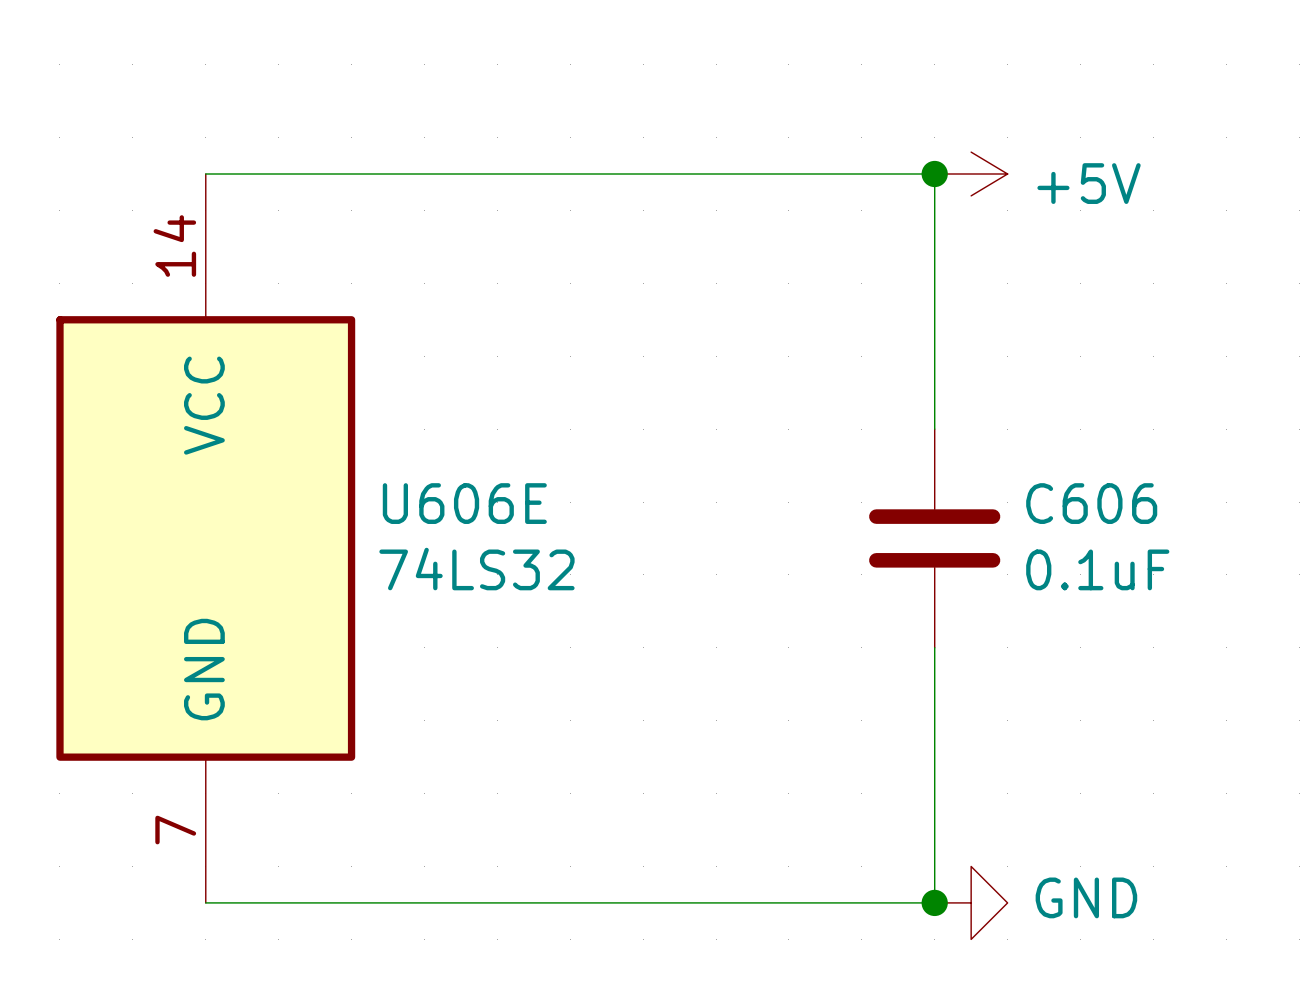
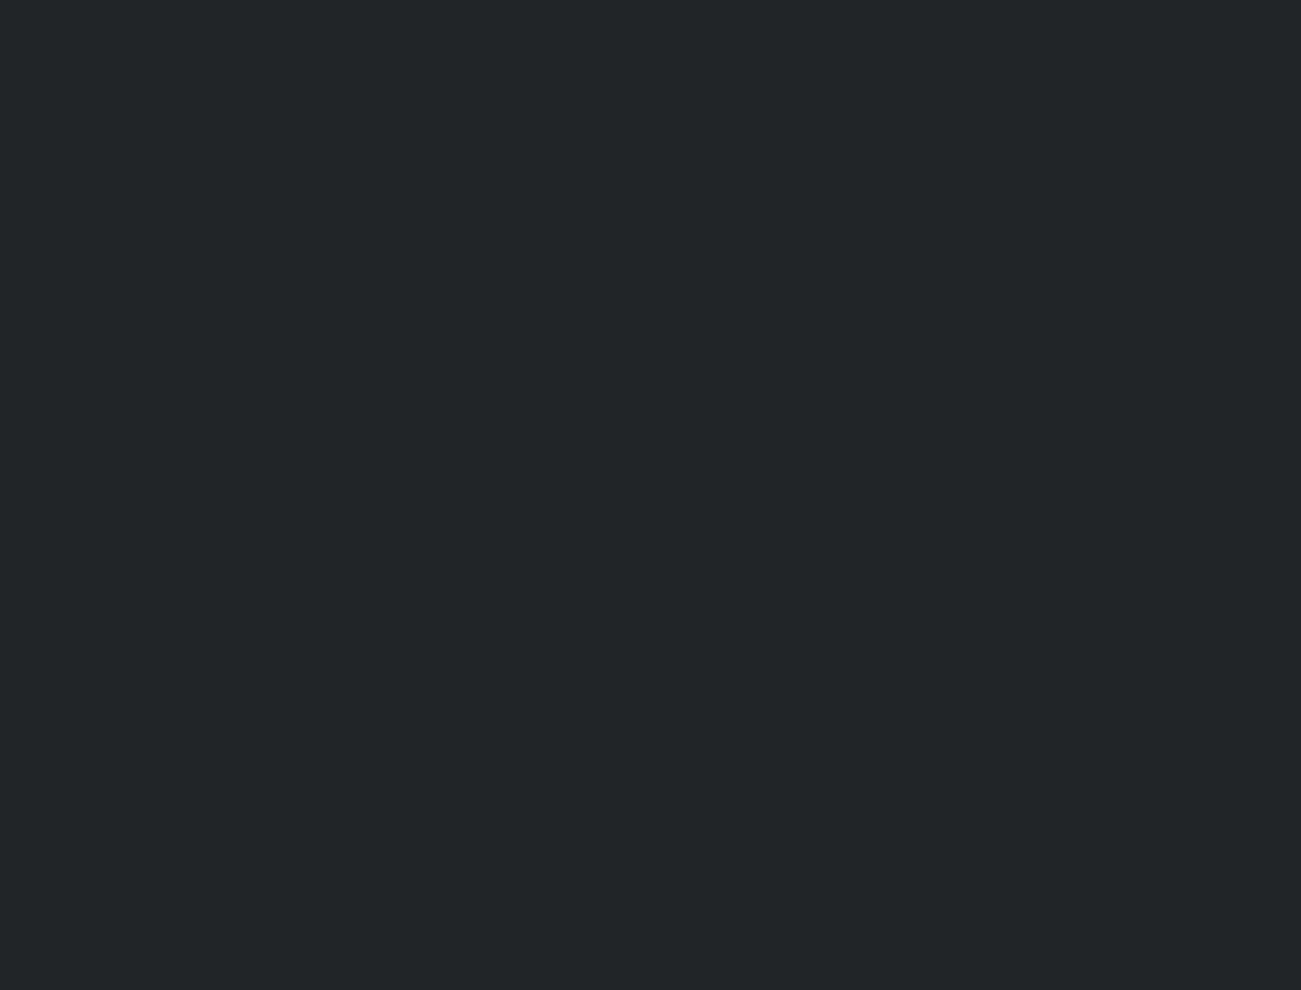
wire: (205, 173) (934, 173) (934, 429) -> none
junction: (934, 173) -> none
power symbol: +5V (971, 173) -> none
U606E: 74LS32 (205, 538) -> none
C606: 0.1uF (934, 538) -> none
wire: (934, 647) (934, 902) (205, 902) -> none
junction: (934, 902) -> none
power symbol: GND (971, 902) -> none

